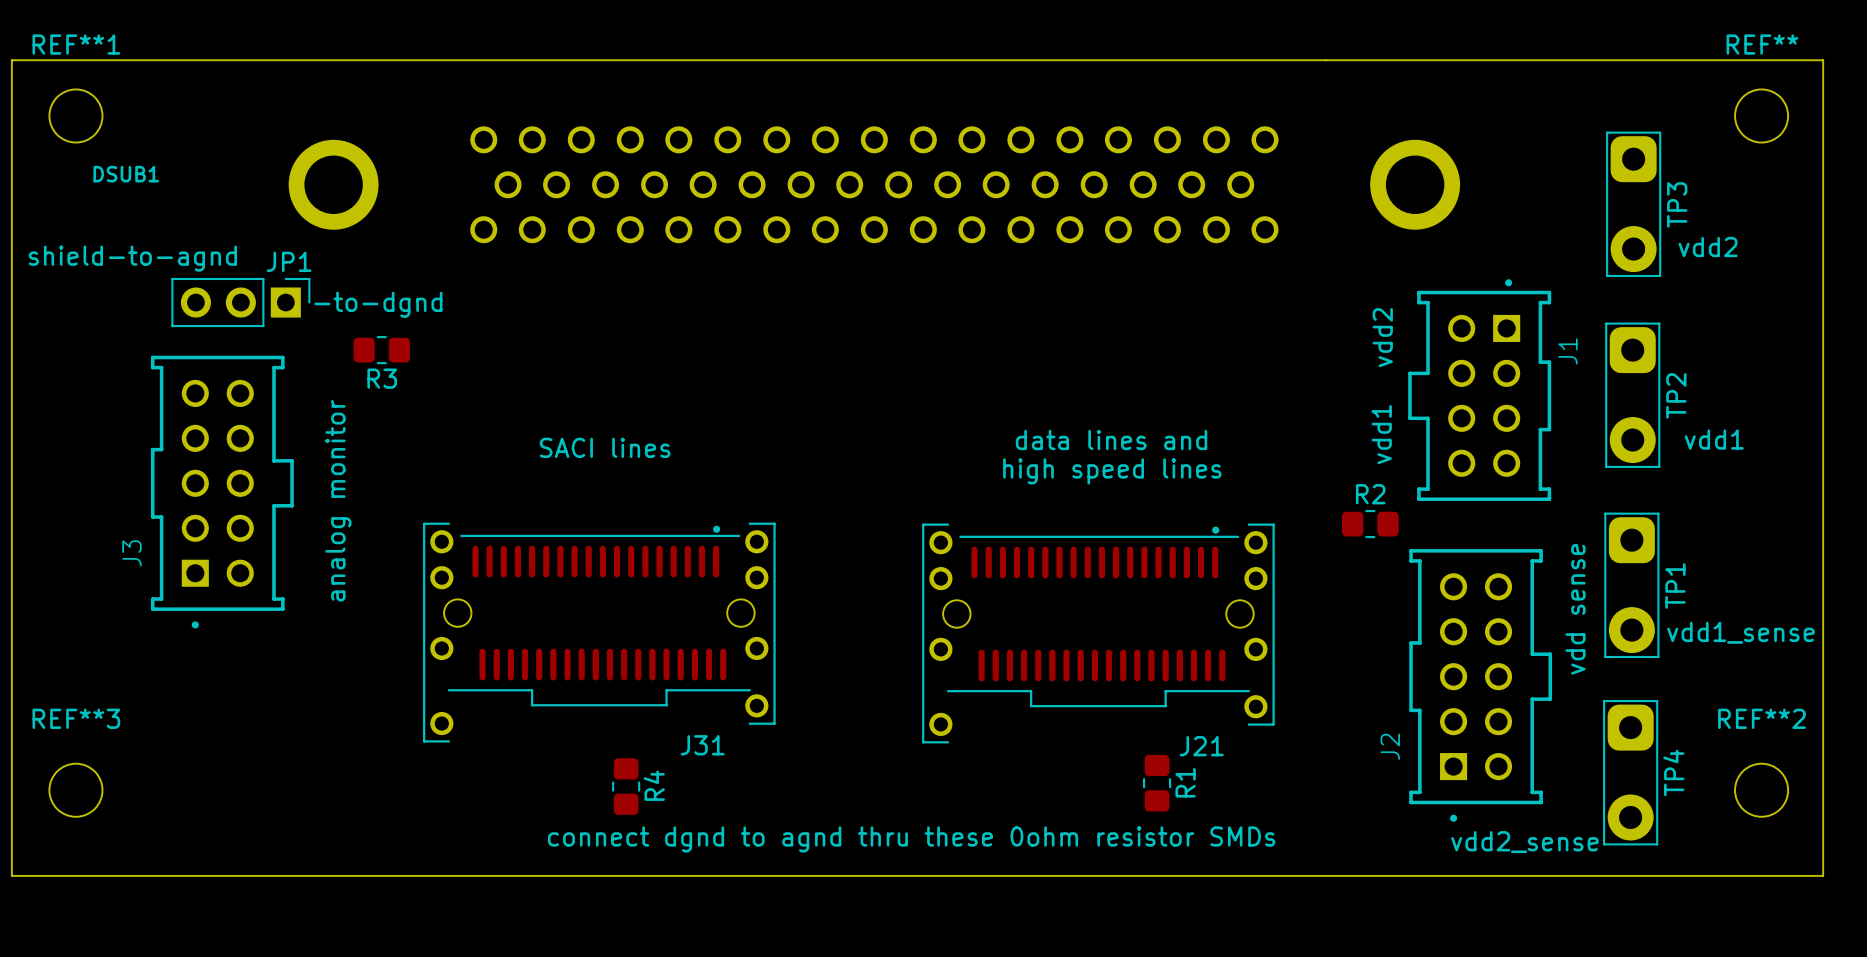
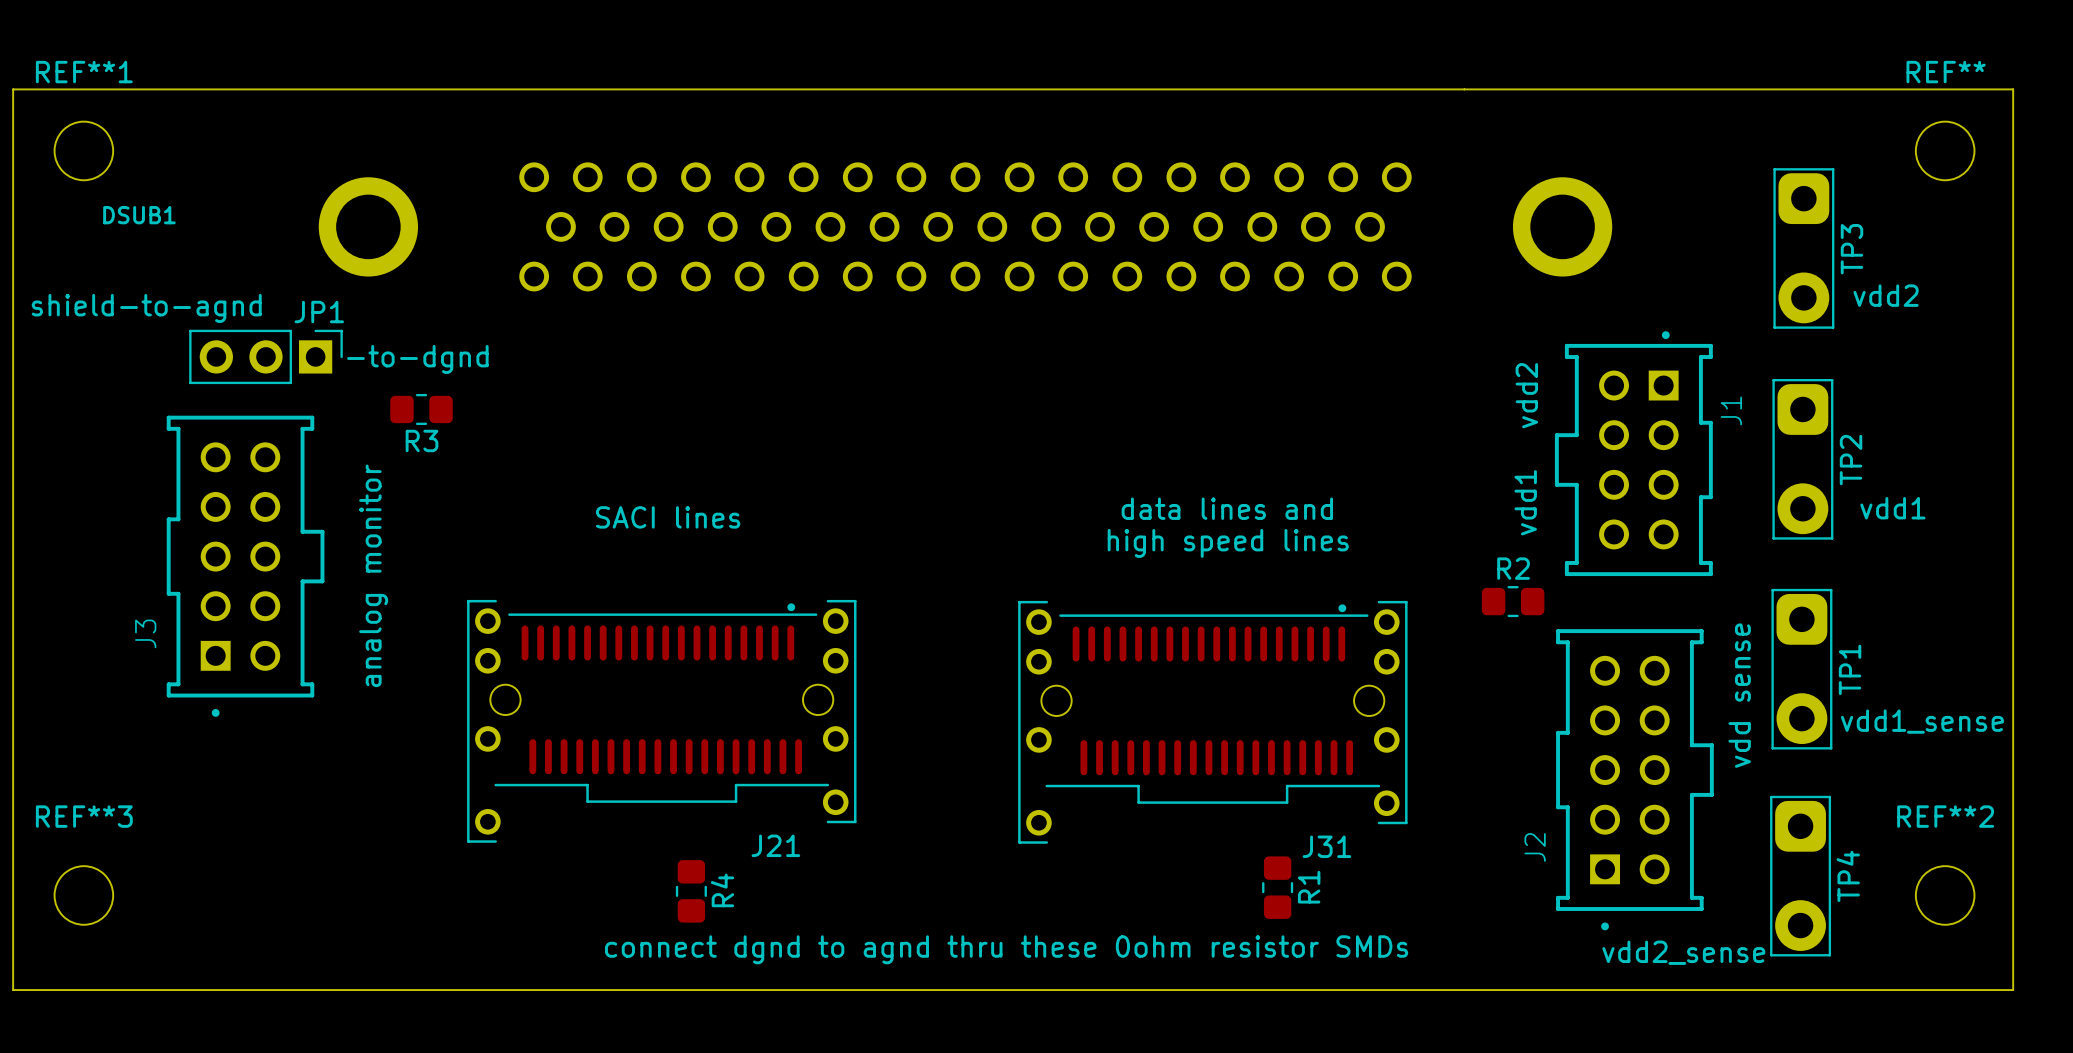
J31 name: J31 (702, 745) -> J21 (775, 845)
J21 name: J21 (1201, 746) -> J31 (1326, 846)

